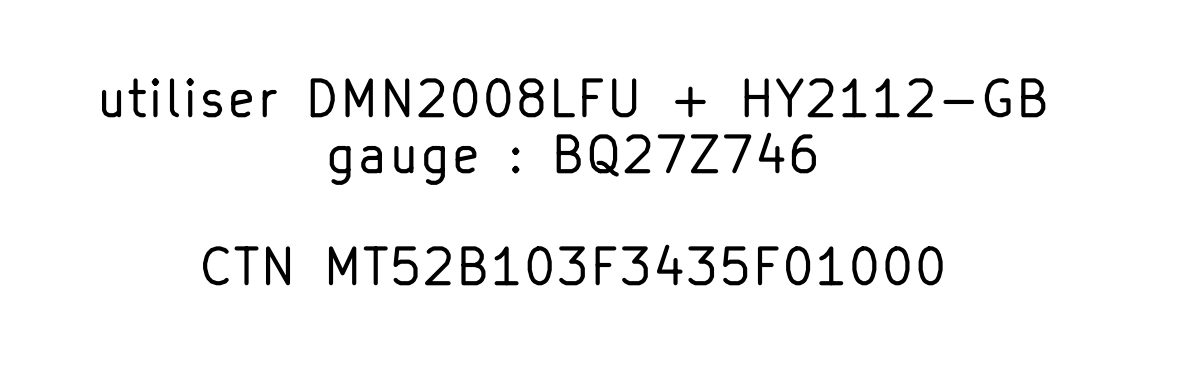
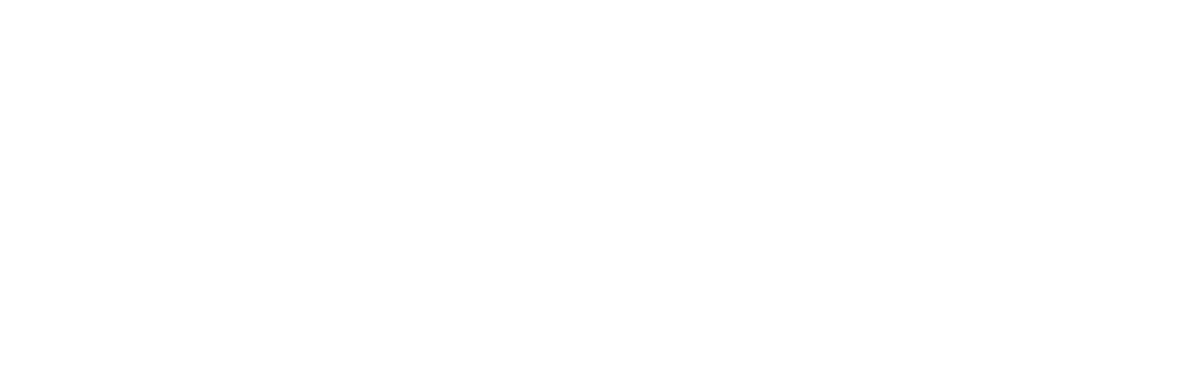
text: utiliser DMN2008LFU + HY2112-GB (573, 97) -> none
text: gauge : BQ27Z746 (572, 158) -> none
text: CTN MT52B103F3435F01000 (572, 264) -> none

